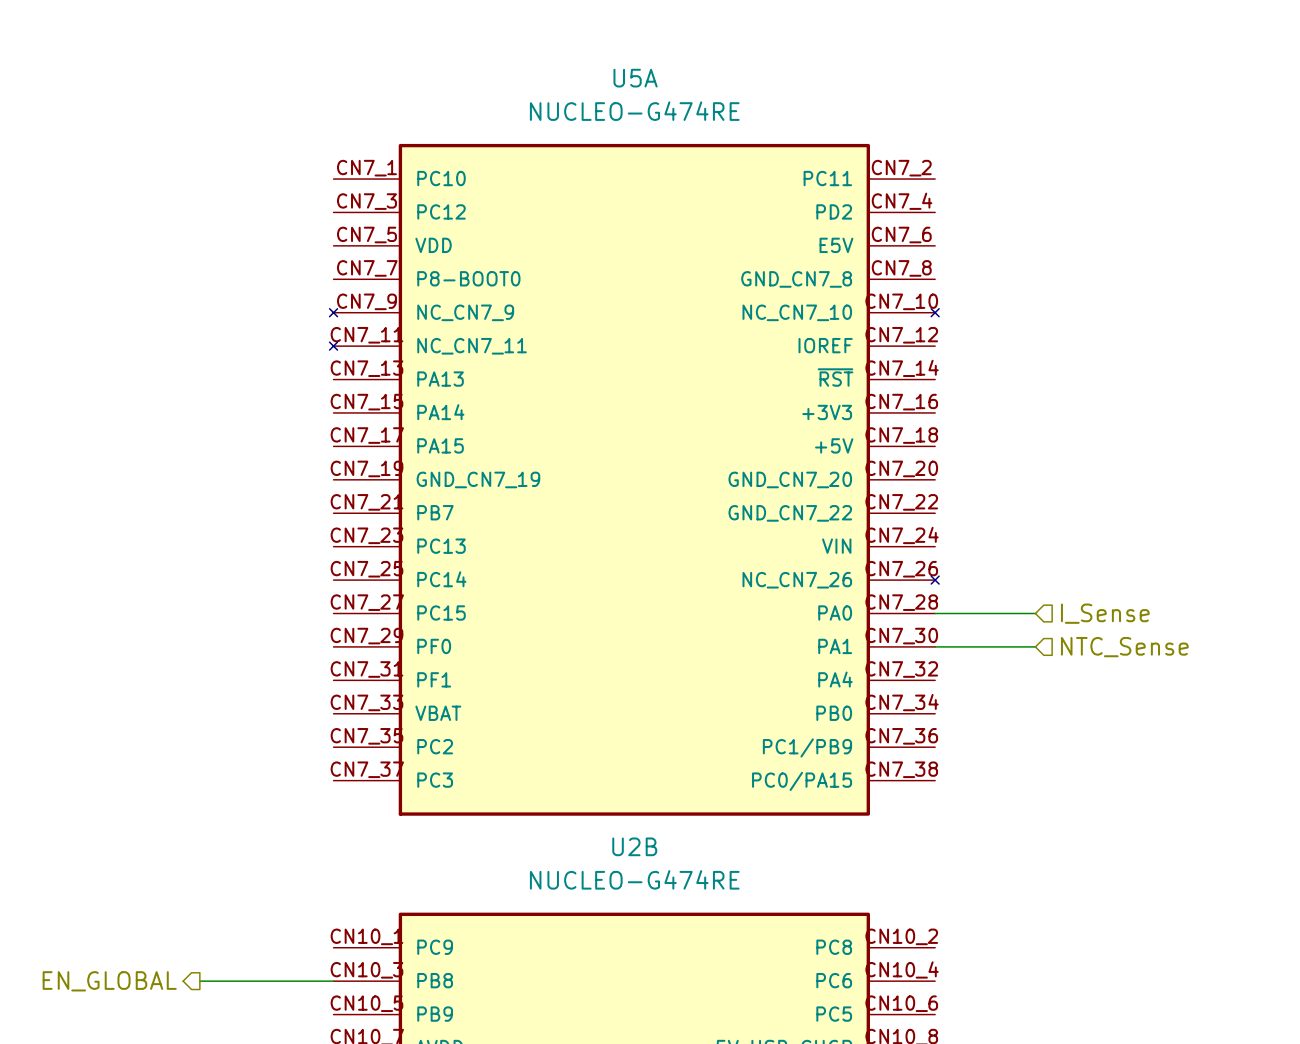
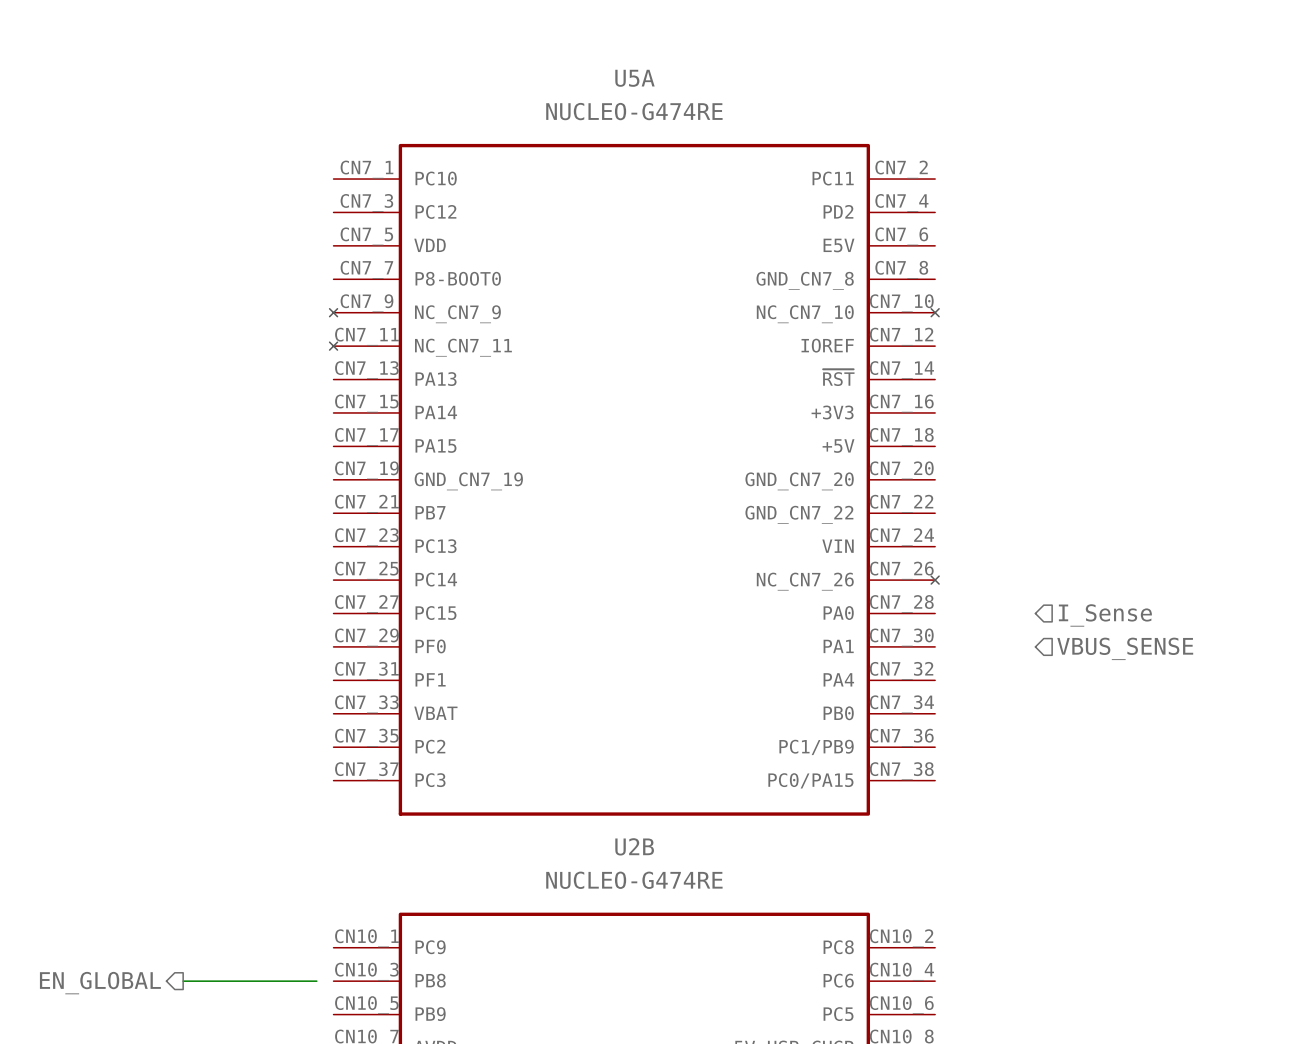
wire: (935, 613) (1035, 613) -> none
wire: (935, 646) (1035, 646) -> none
hierarchical label: NTC_Sense (1124, 647) -> VBUS_SENSE (1125, 648)
hierarchical label position: EN_GLOBAL (109, 981) -> EN_GLOBAL (100, 983)
wire: (316, 981) (333, 981) -> (183, 981) (199, 981)

